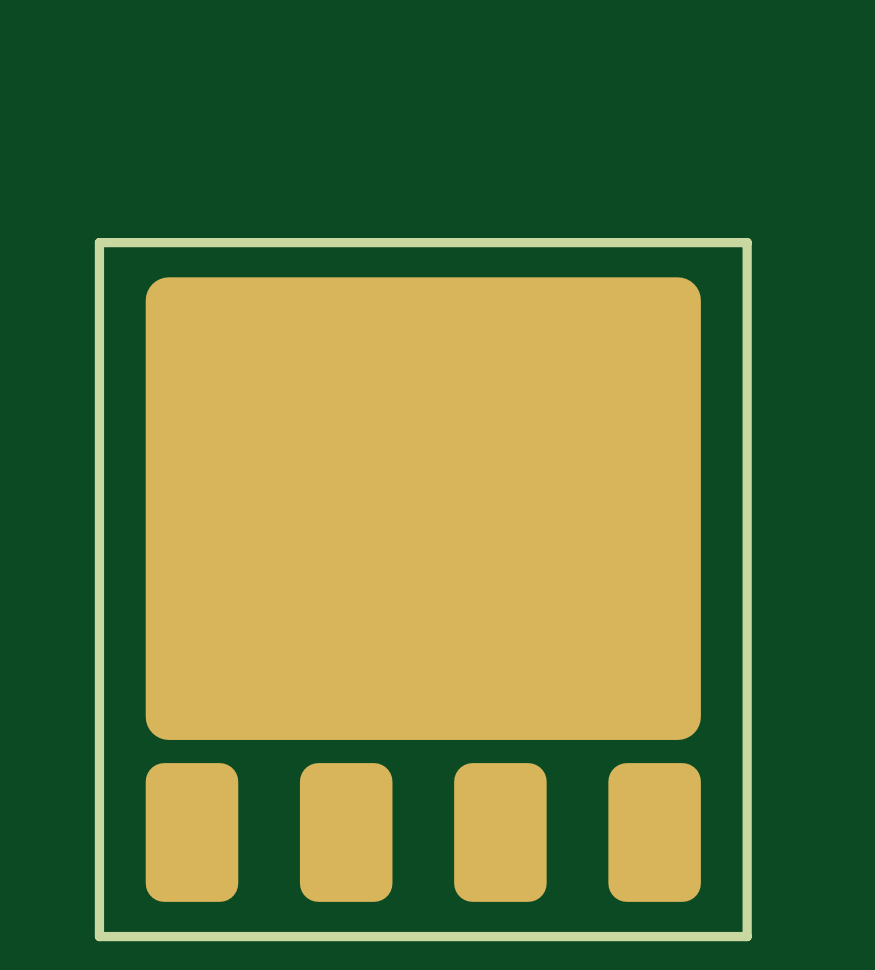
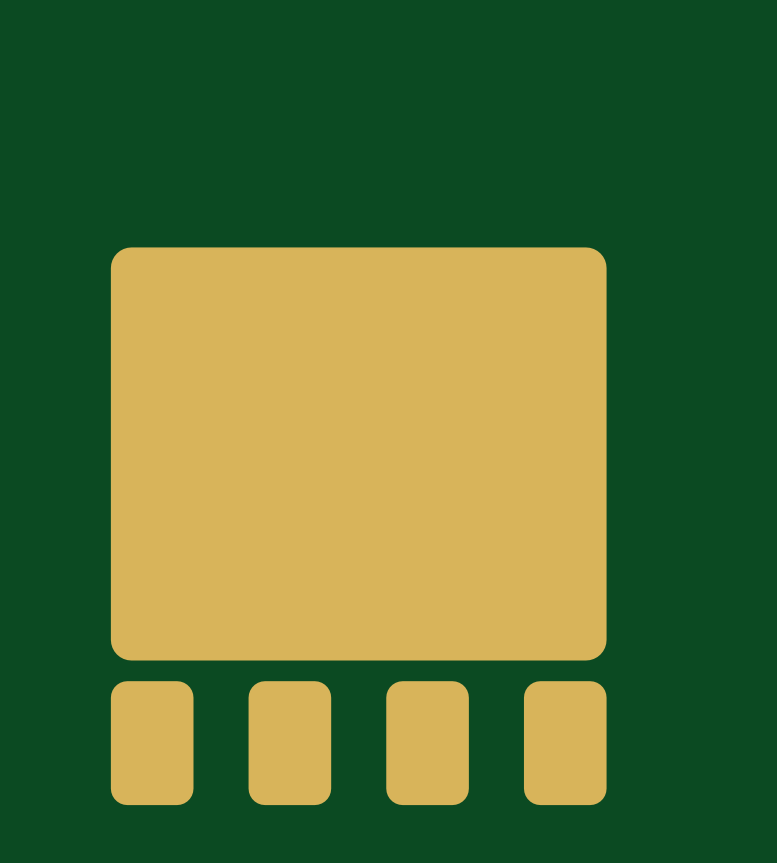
board edge: (99, 242) (99, 936) (747, 936) (747, 242) (99, 242) -> none

